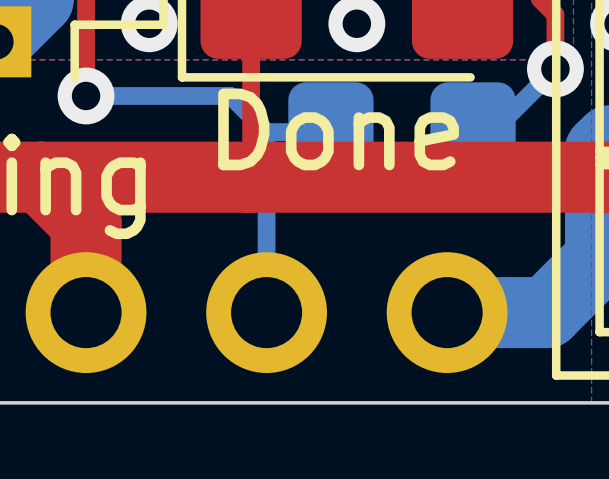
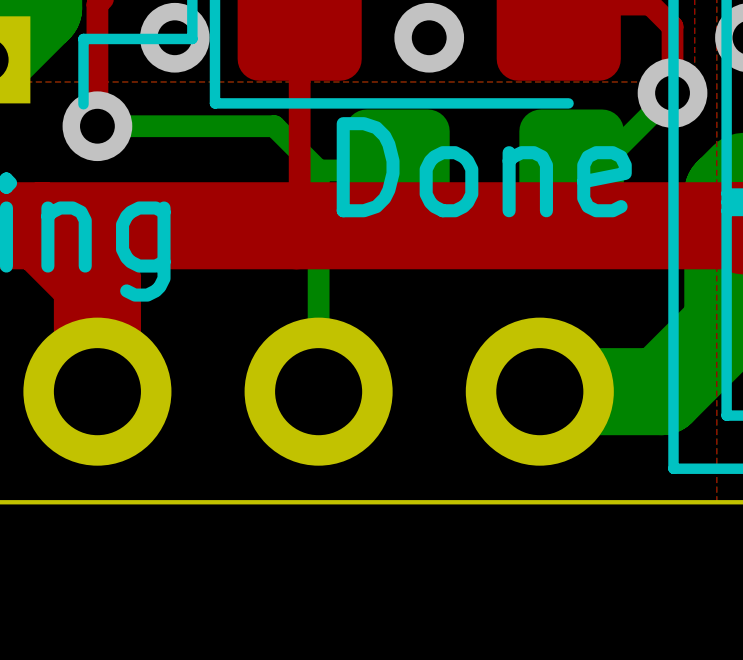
text position: Done (338, 129) -> Done (484, 167)

